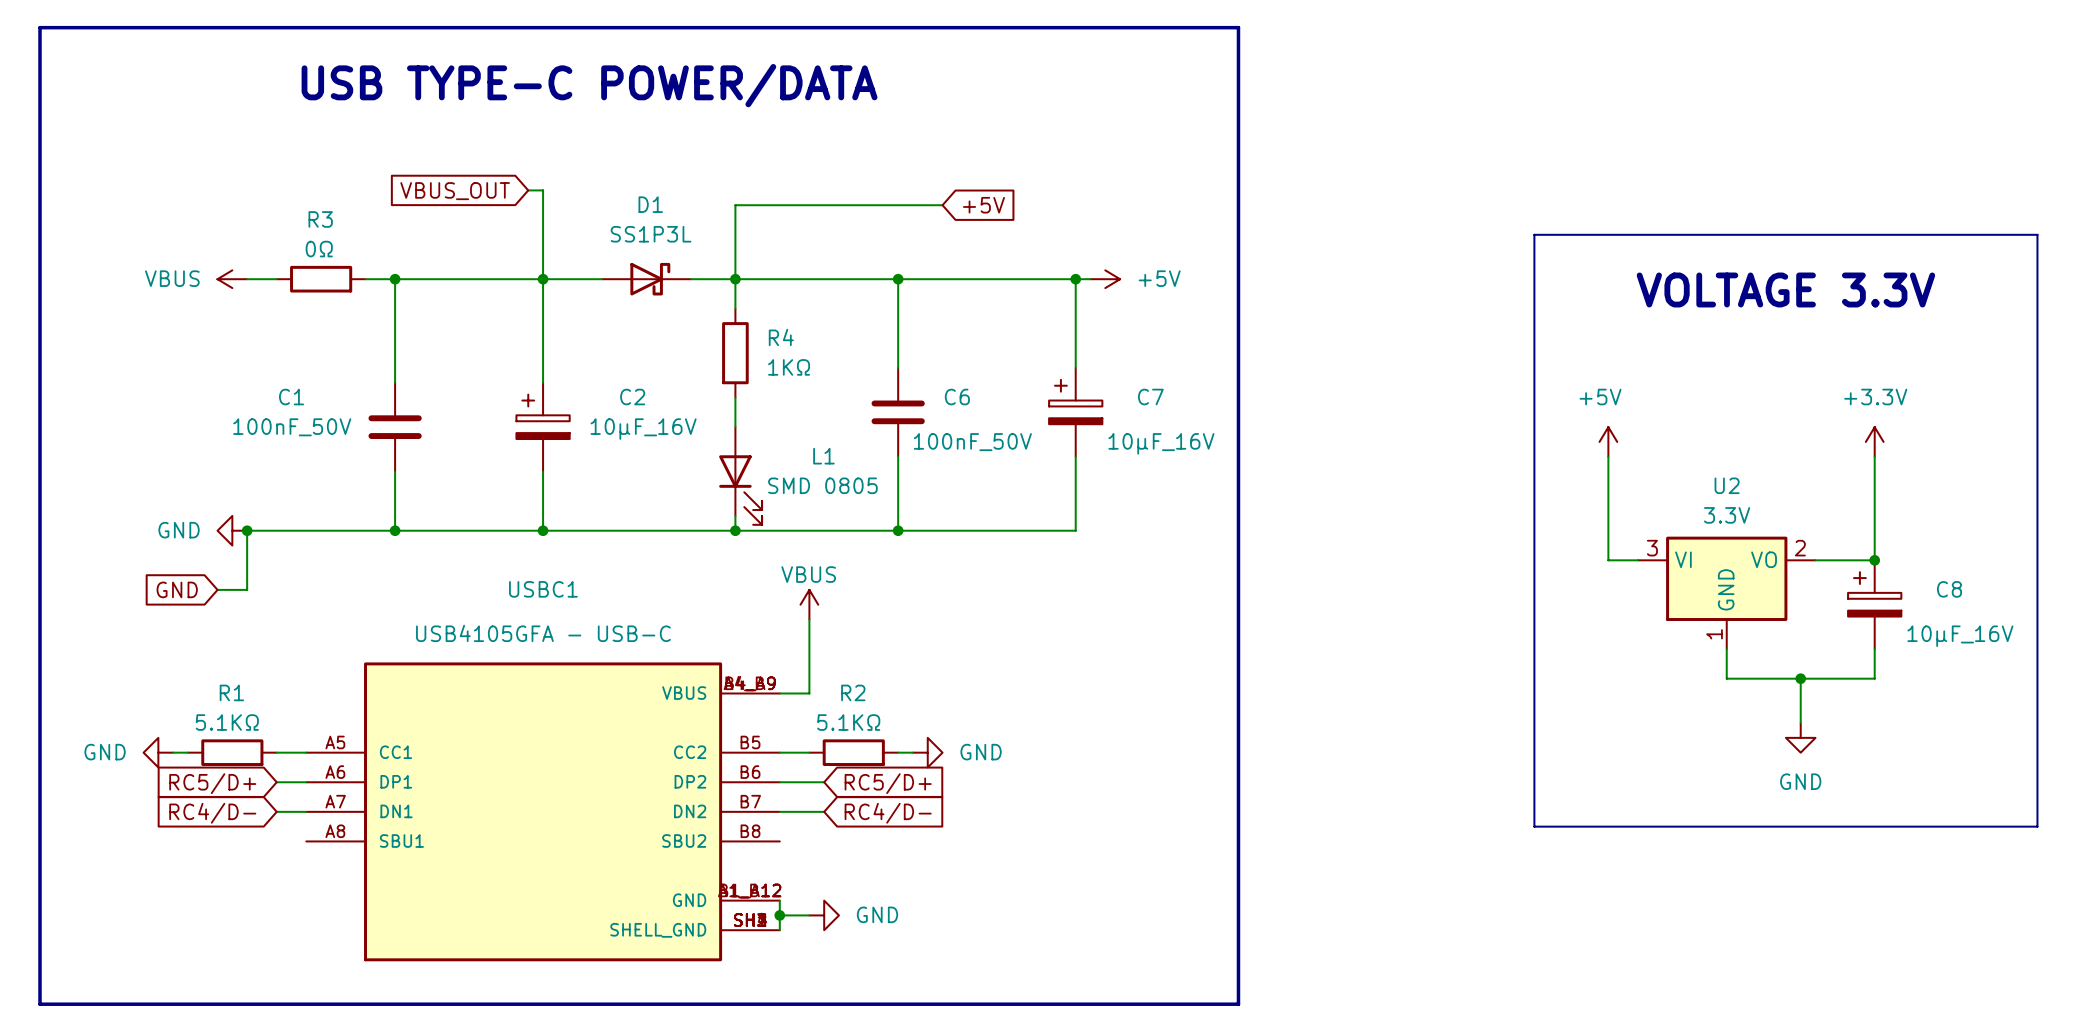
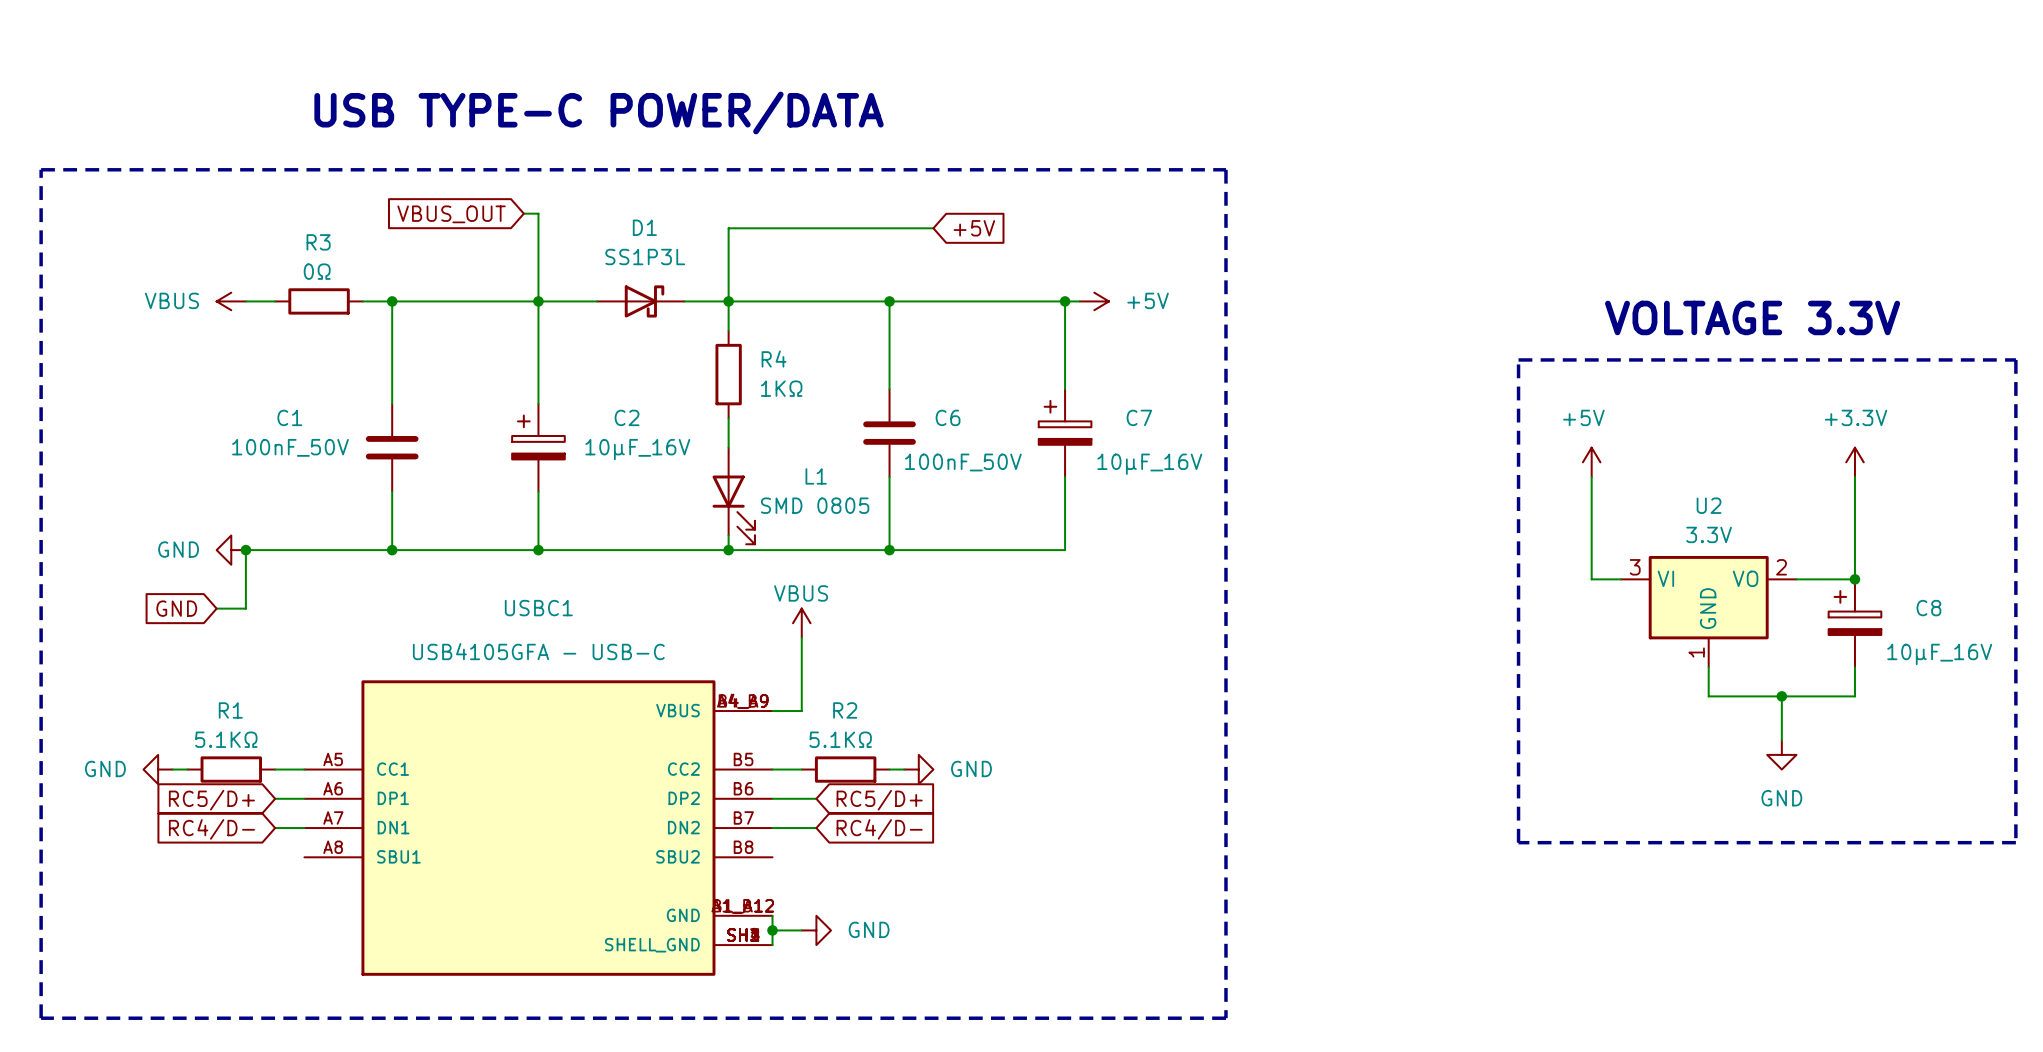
line: (40, 27) (1238, 27) (1238, 1004) (40, 1004) (40, 27) -> (41, 169) (41, 1018) (1225, 1018) (1225, 169) (41, 169)
text position: USB TYPE-C POWER/DATA (589, 85) -> USB TYPE-C POWER/DATA (599, 112)
line: (1534, 234) (2037, 234) (2037, 826) (1534, 826) (1534, 234) -> (1518, 359) (1518, 842) (2015, 842) (2015, 359) (1518, 359)
text position: VOLTAGE 3.3V (1785, 289) -> VOLTAGE 3.3V (1752, 317)

